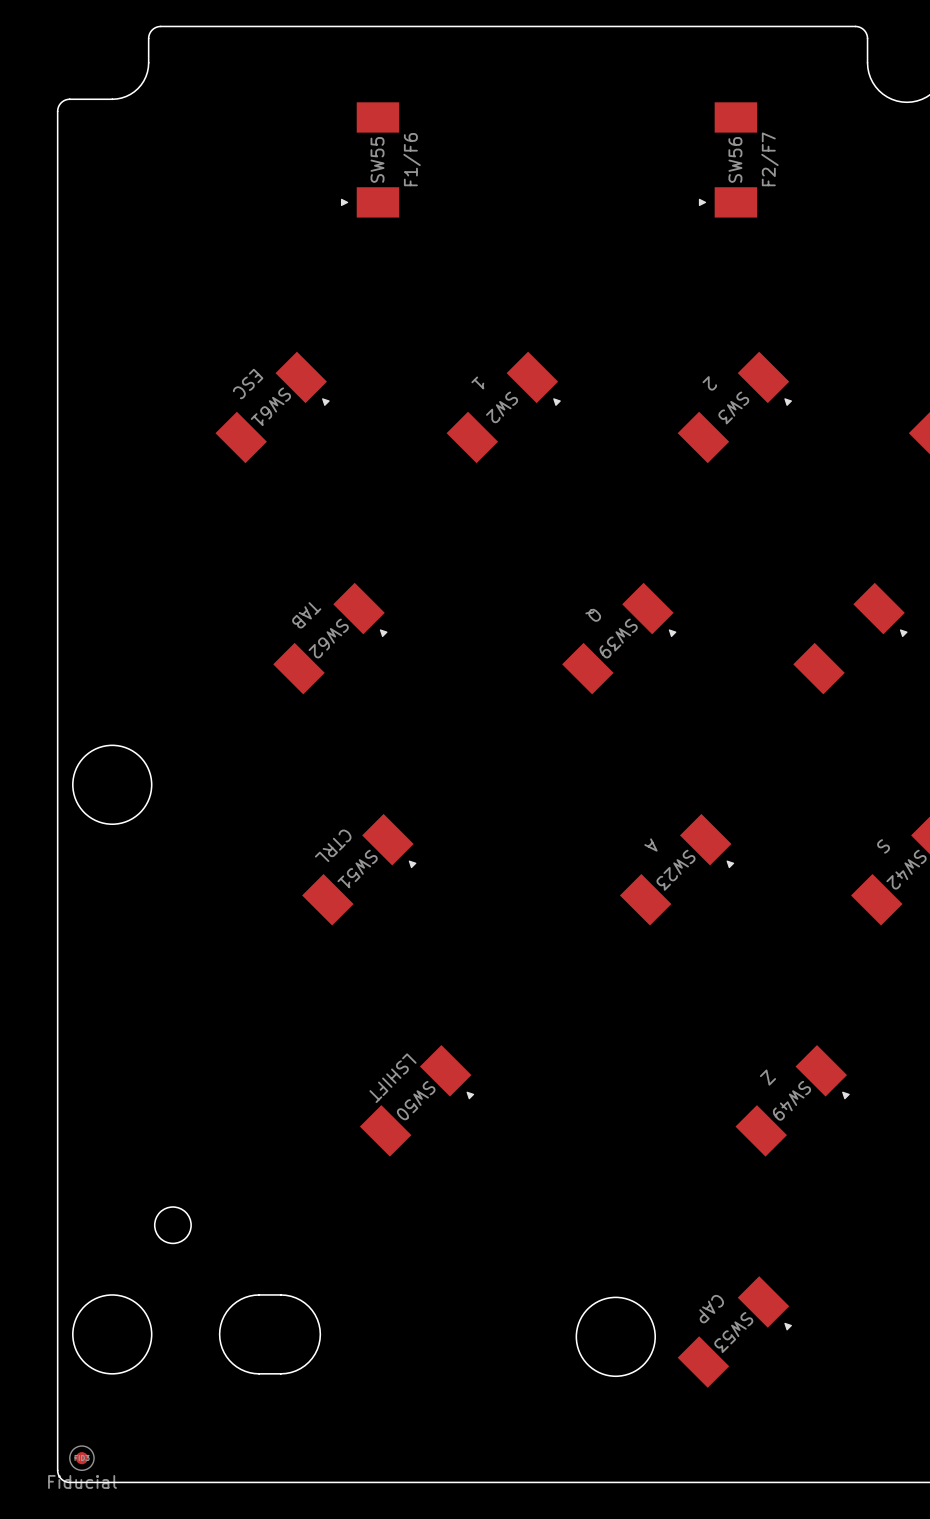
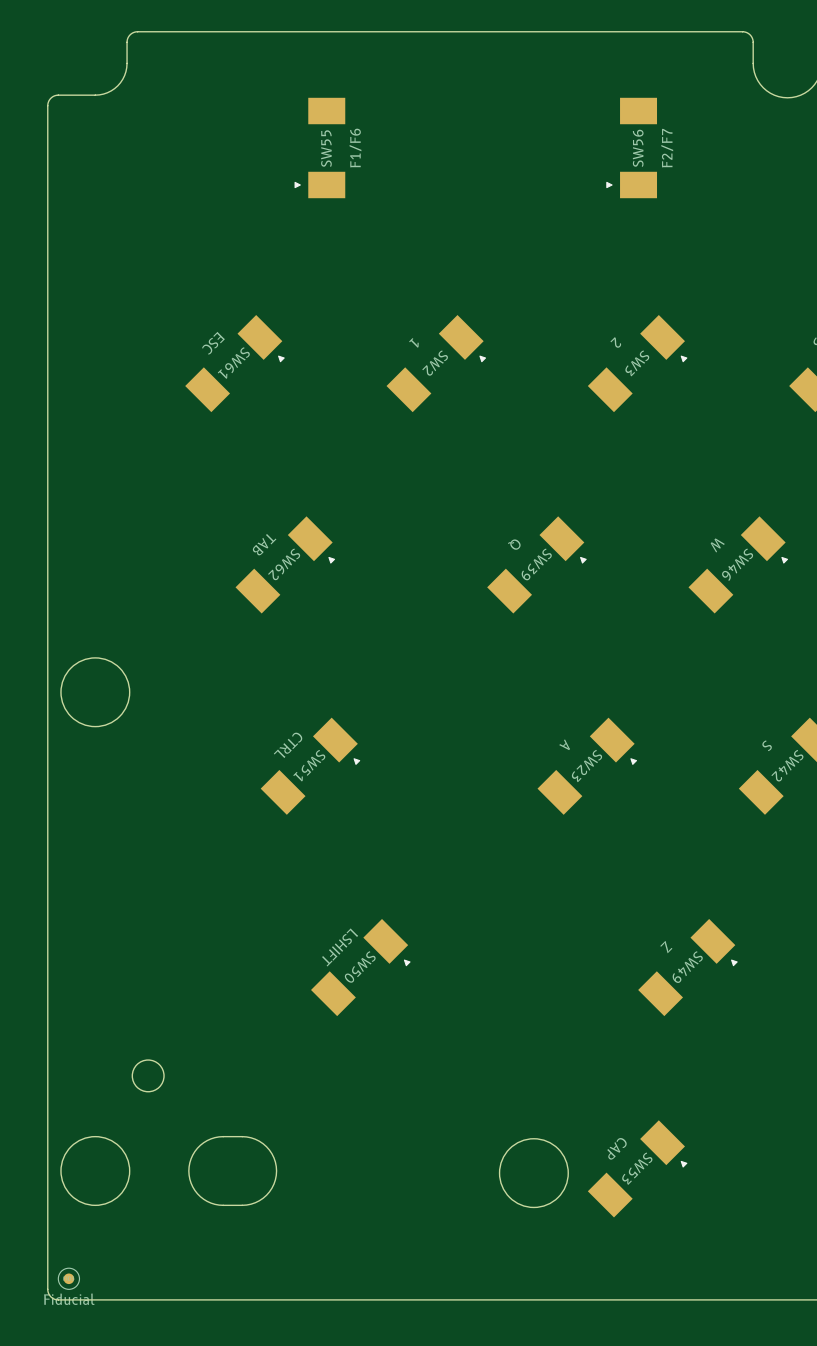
SW46 value: none -> W (717, 545)
SW46 name: none -> SW46 (737, 564)

